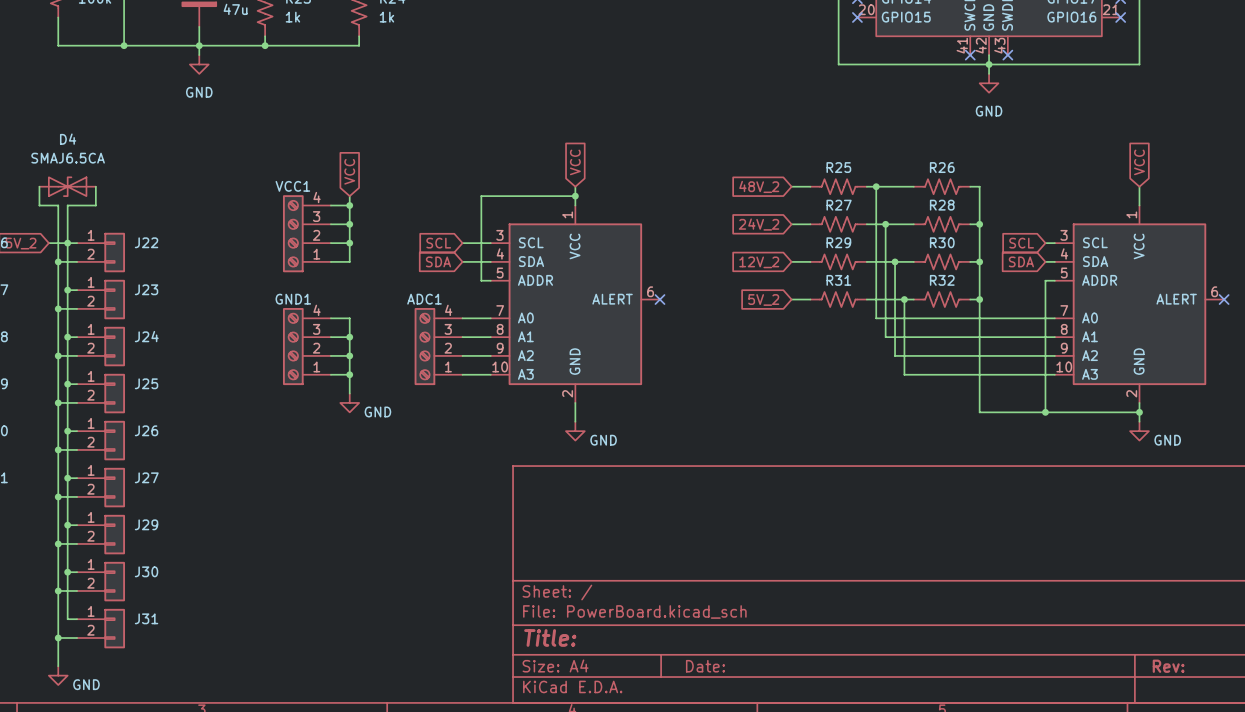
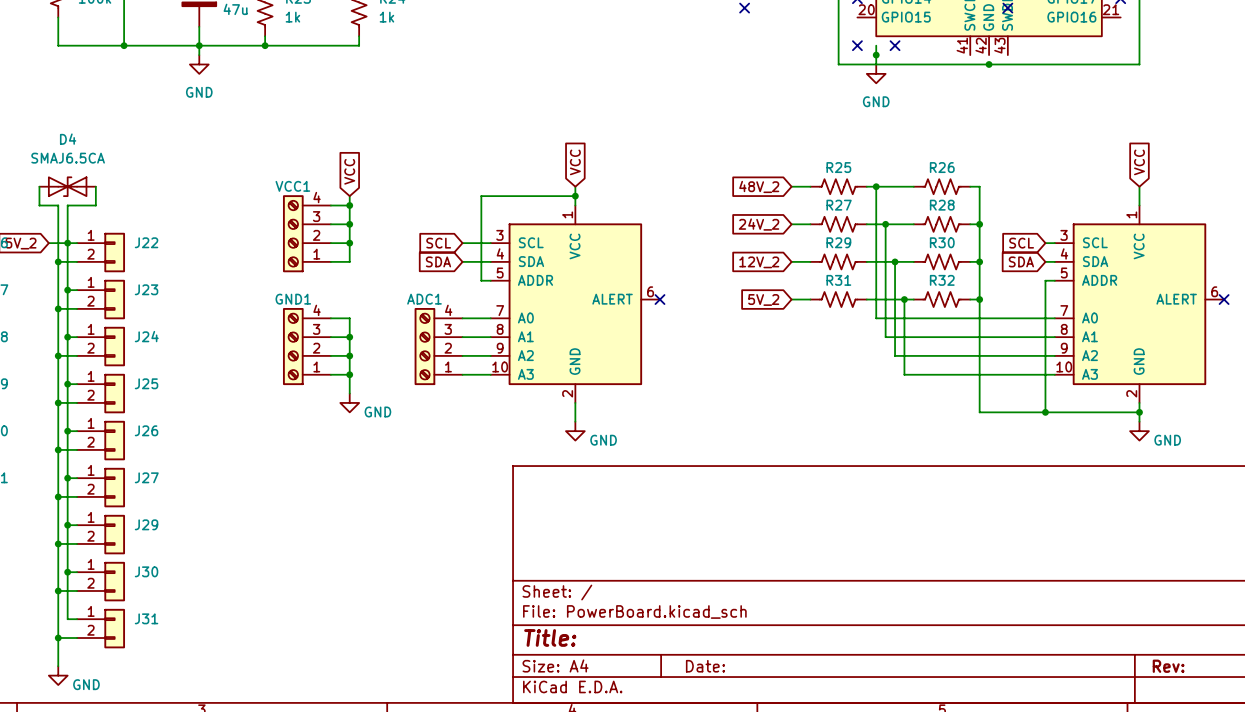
no-connect mark: none -> (744, 8)
no-connect mark: none -> (1007, 8)
no-connect mark: (857, 17) -> none
no-connect mark: (1120, 17) -> none
no-connect mark: none -> (857, 45)
no-connect mark: none -> (895, 45)
junction: none -> (876, 55)
no-connect mark: (970, 55) -> none
wire: (989, 55) (989, 73) -> (876, 45) (876, 64)
no-connect mark: (1007, 55) -> none
power symbol position: GND (989, 83) -> GND (876, 73)

